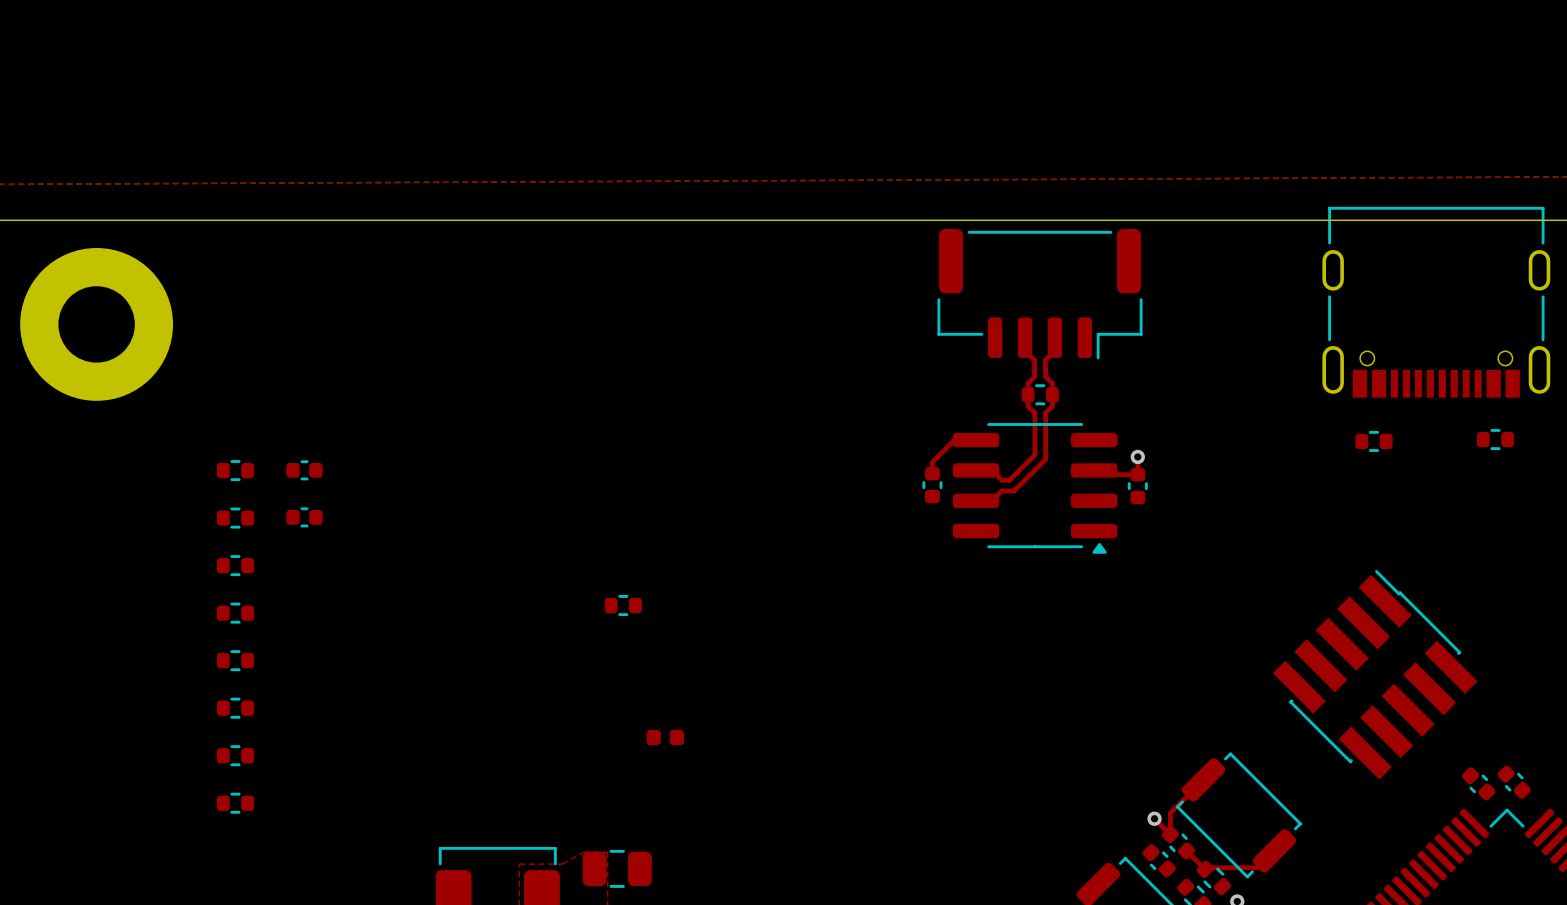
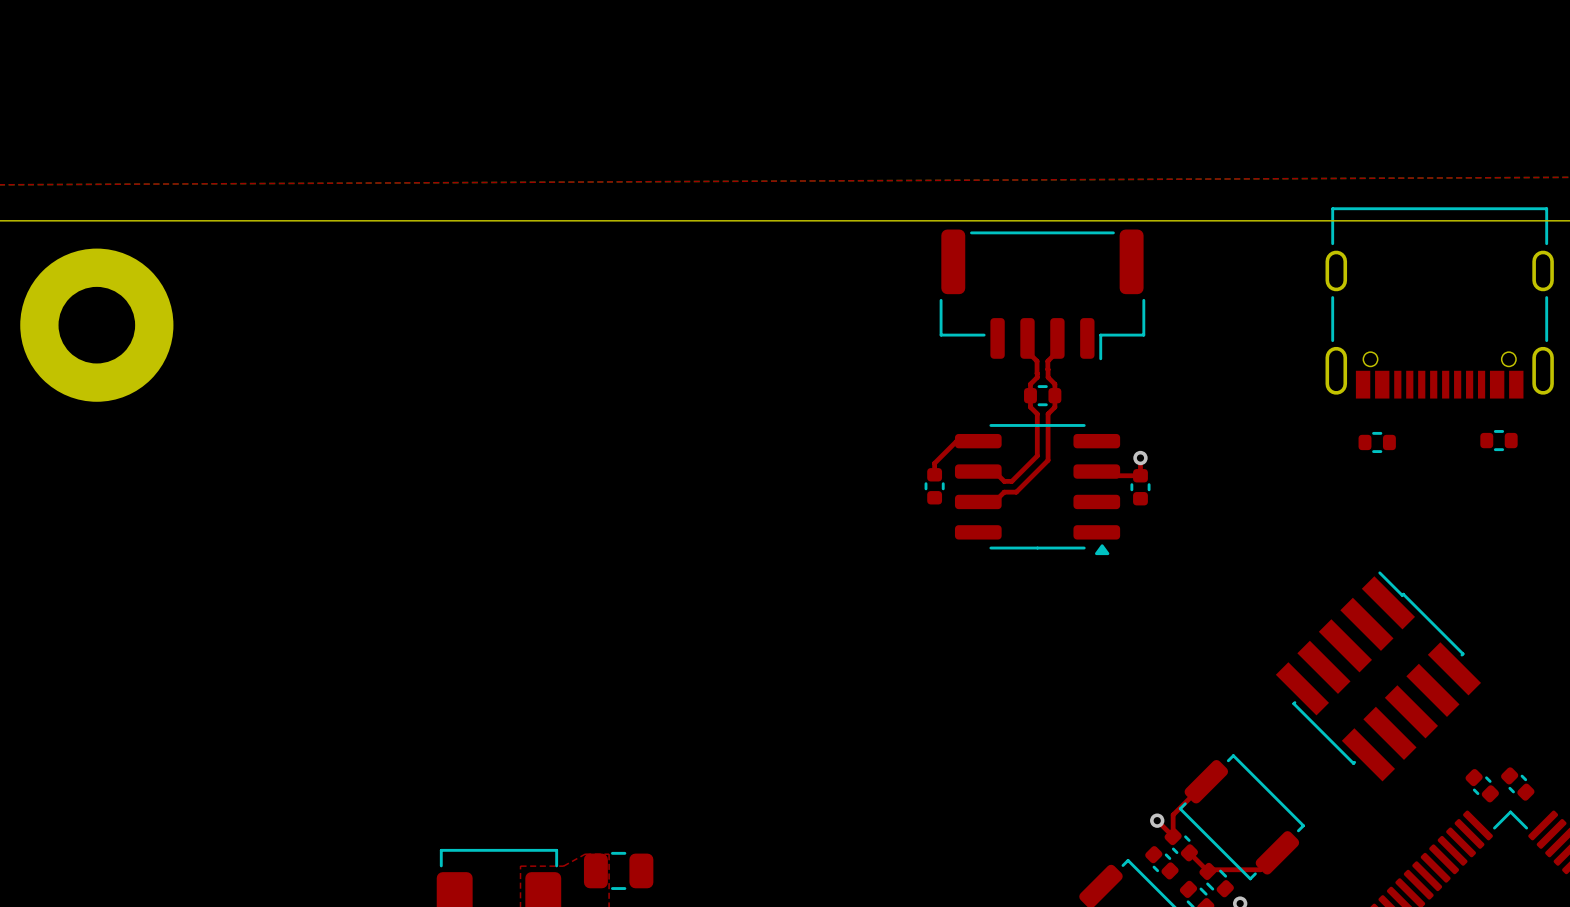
part: (235, 470) -> none
part: (304, 470) -> none
part: (304, 517) -> none
part: (235, 518) -> none
part: (235, 565) -> none
part: (623, 605) -> none
part: (235, 613) -> none
part: (235, 660) -> none
part: (235, 708) -> none
part: (665, 737) -> none
part: (235, 755) -> none
part: (235, 803) -> none

